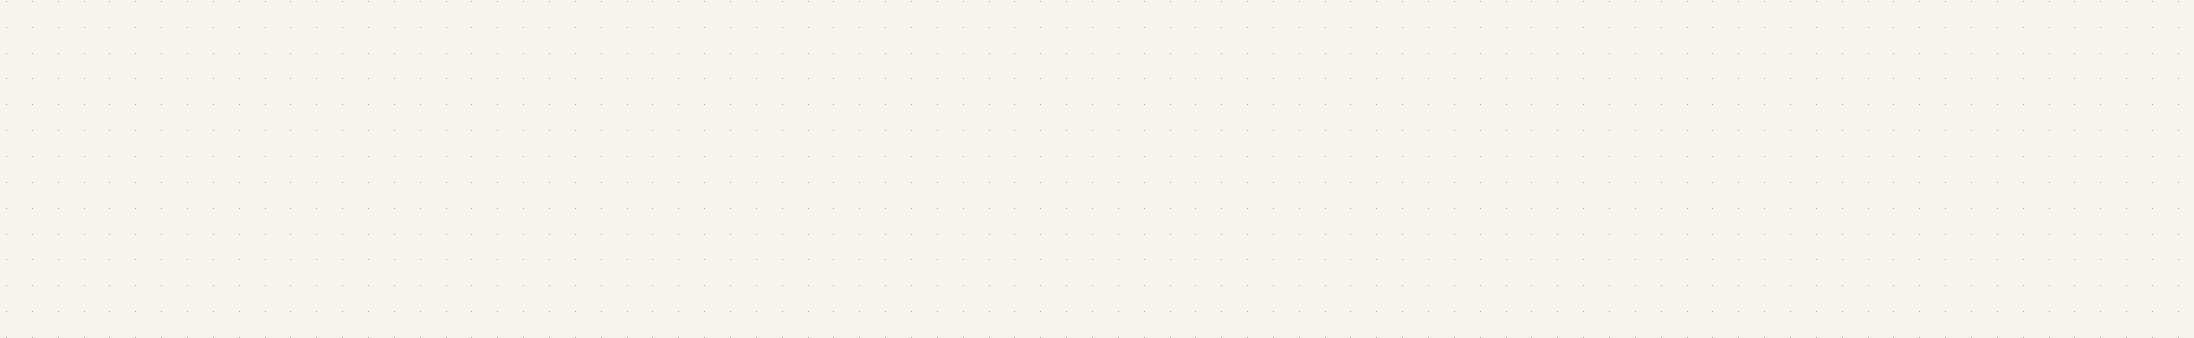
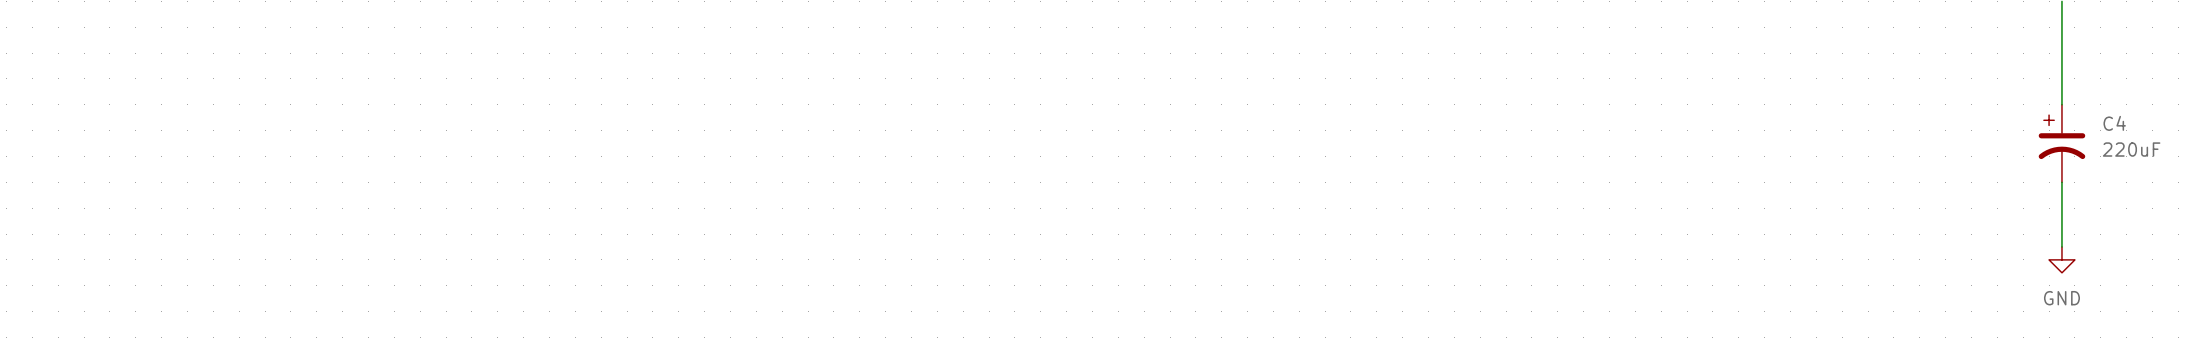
wire: none -> (2061, 1) (2061, 104)
C4: none -> 220uF (2061, 143)
wire: none -> (2061, 182) (2061, 246)
power symbol: none -> GND (2061, 259)

